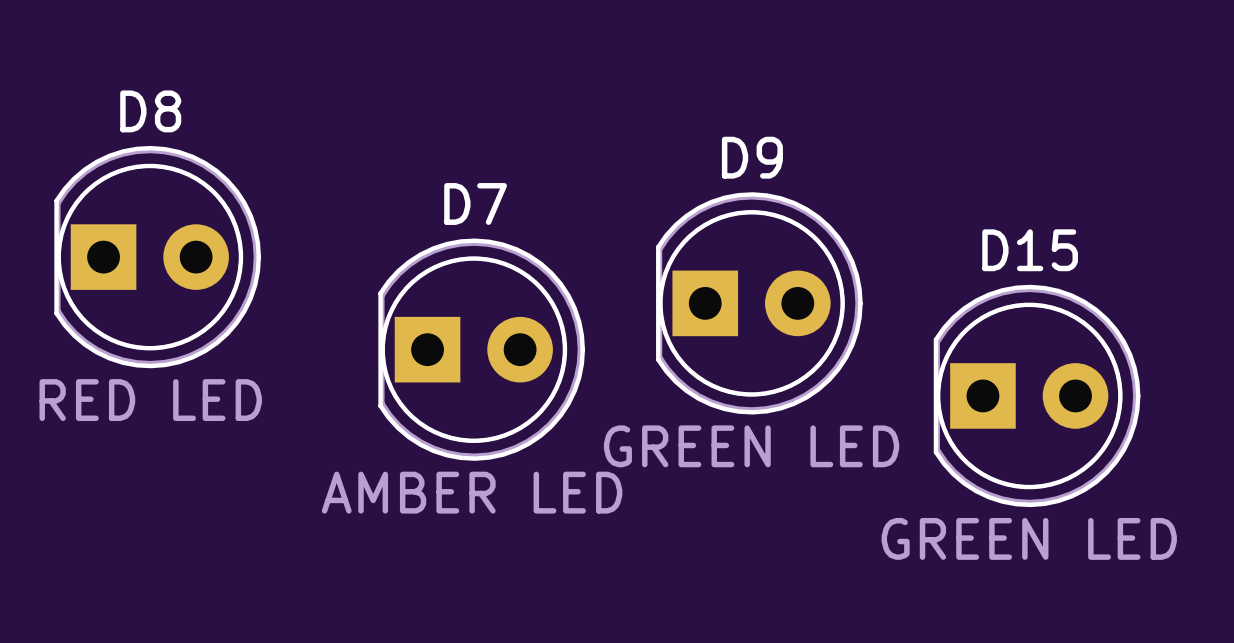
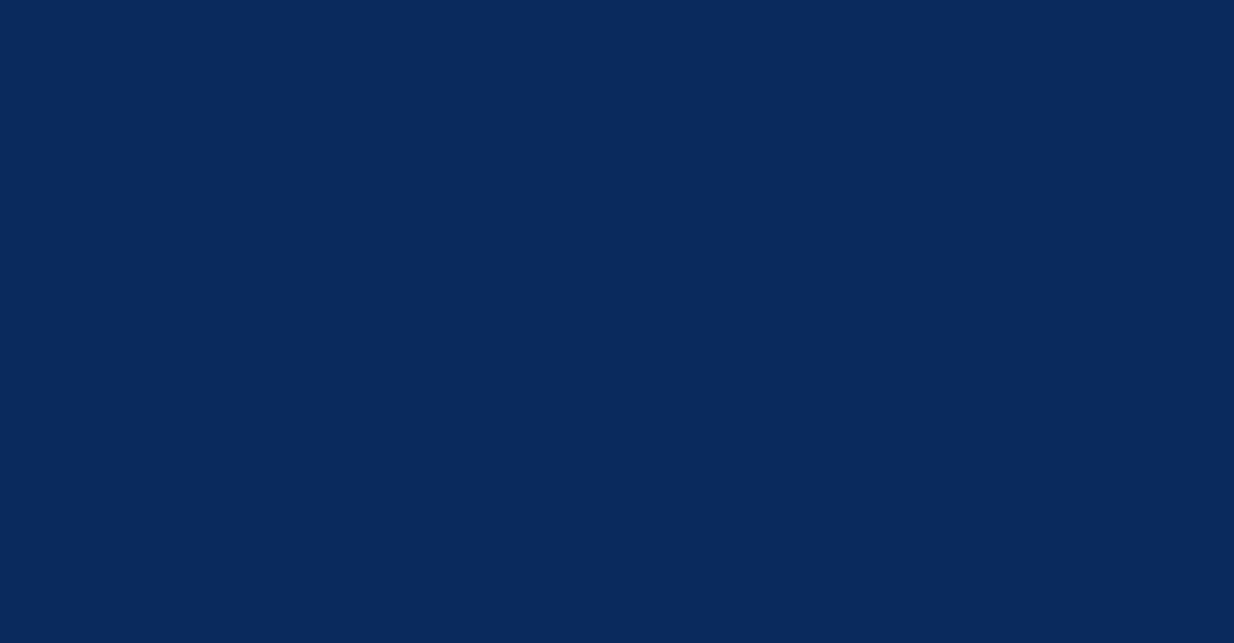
D8: RED LED (157, 257) -> none
D9: GREEN LED (759, 303) -> none
D7: AMBER LED (481, 349) -> none
D15: GREEN LED (1037, 395) -> none

